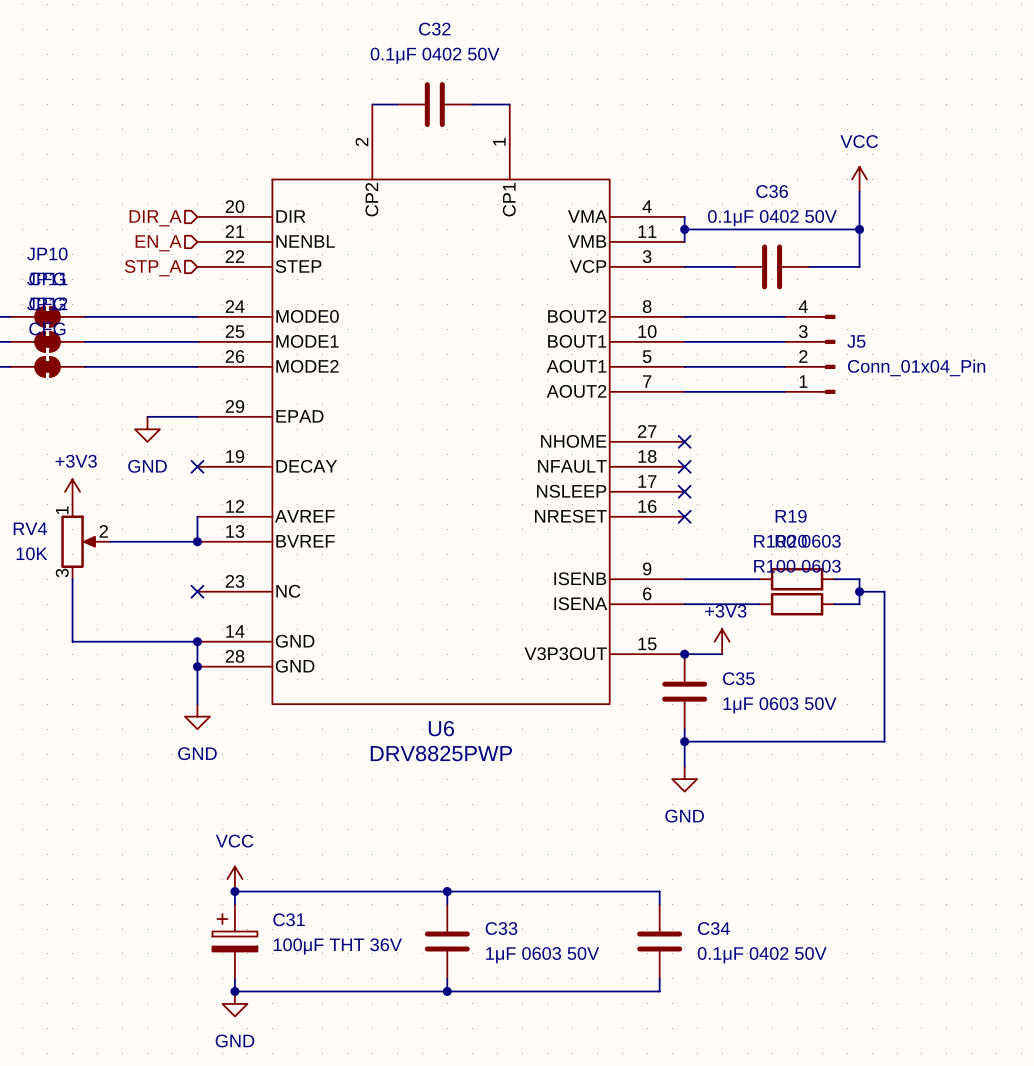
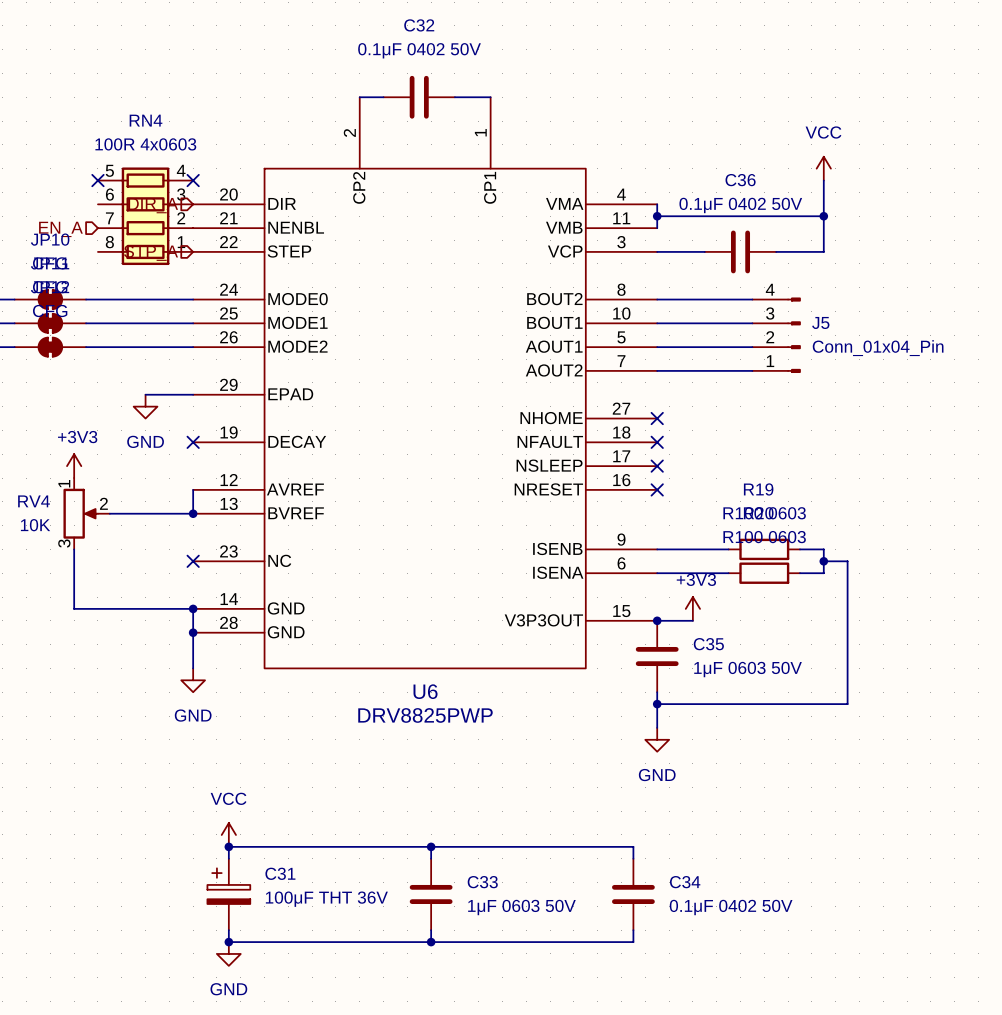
no-connect mark: none -> (97, 180)
no-connect mark: none -> (193, 180)
RN4: none -> 100R 4x0603 (145, 216)
hierarchical label position: EN_A (158, 243) -> EN_A (60, 229)

